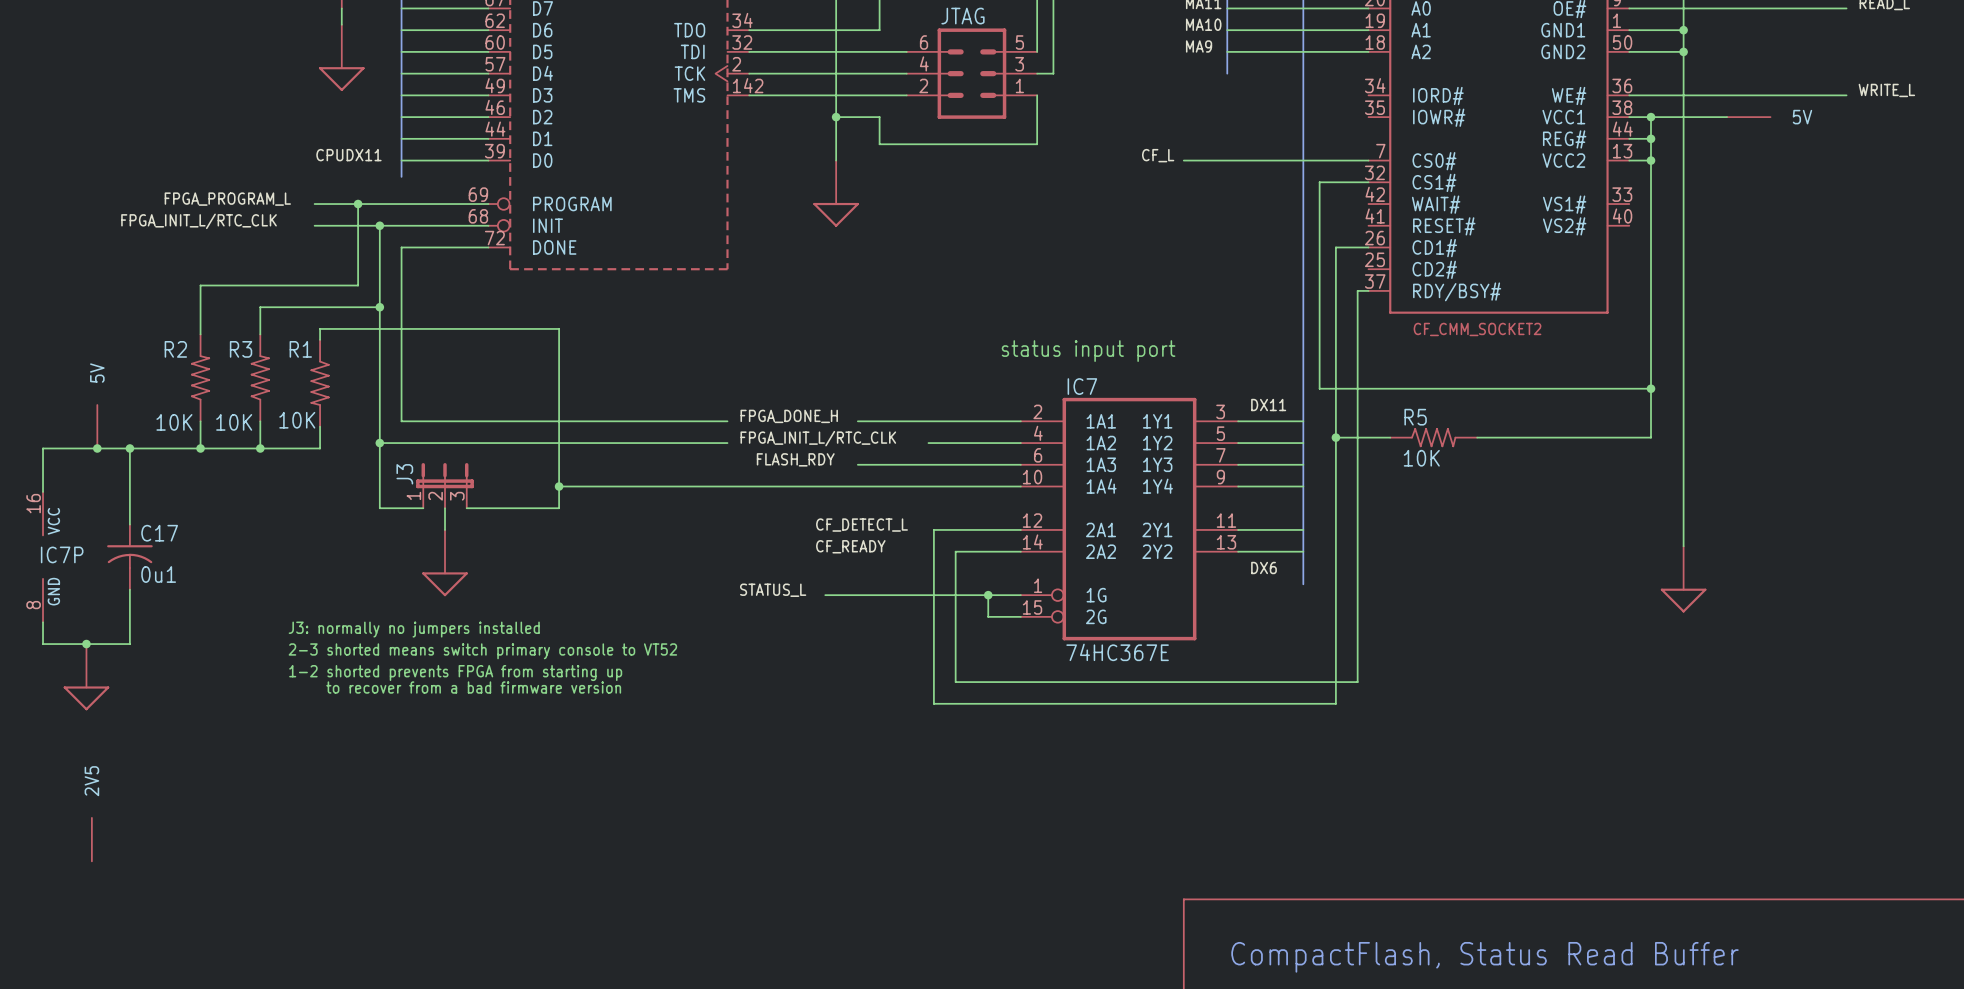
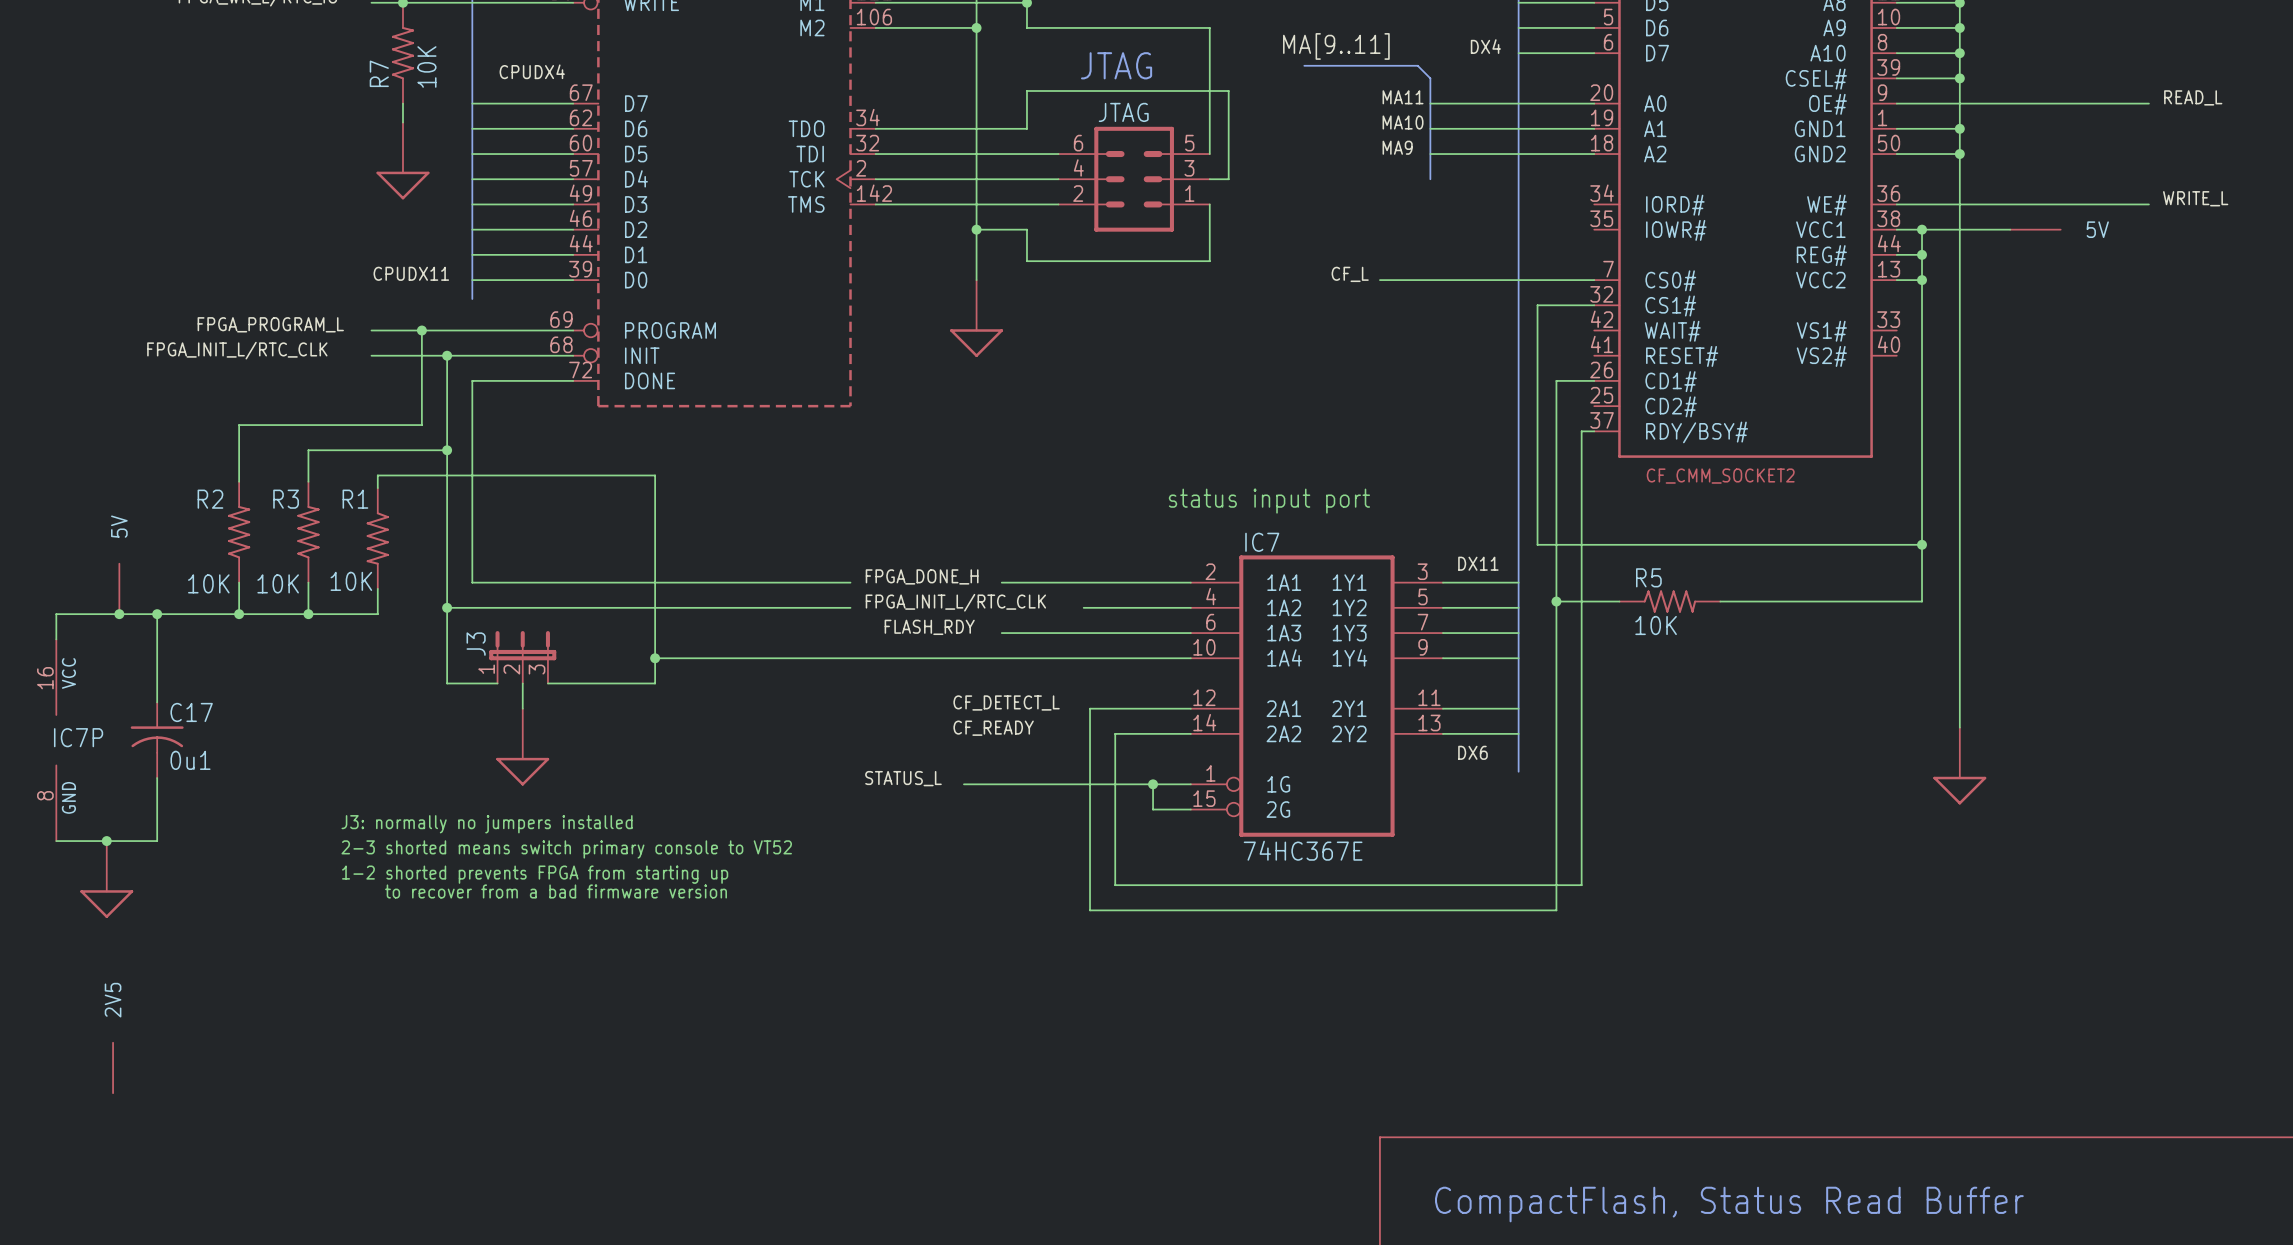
IC7P symbol: [43, 491, 44, 623] -> [56, 639, 57, 842]

